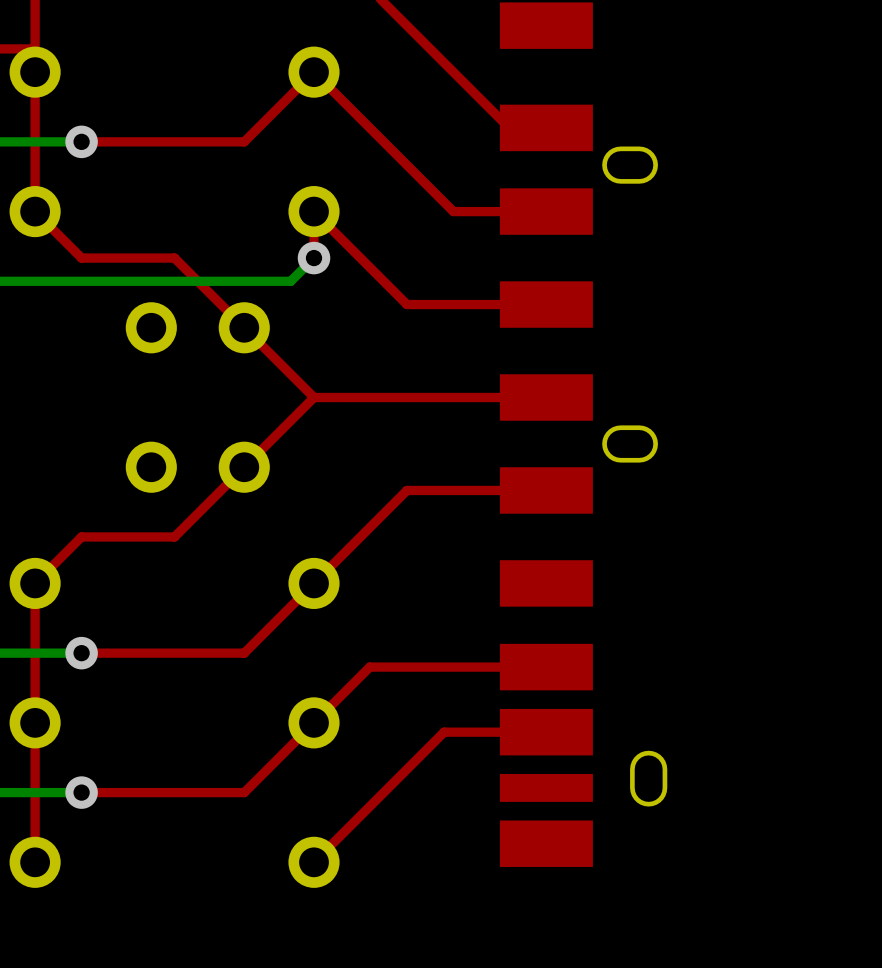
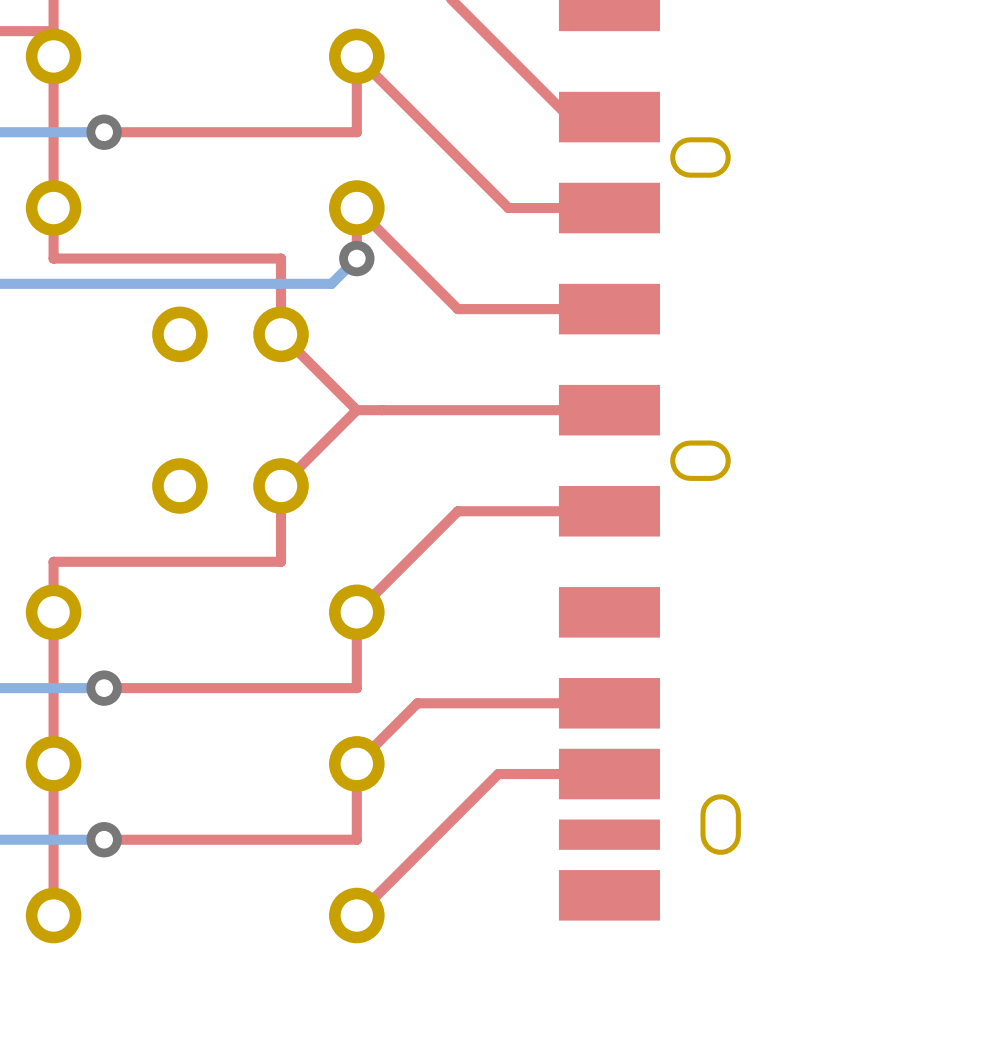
top track: (314, 72) (244, 141) -> (356, 56) (356, 132) (281, 132)
top track: (35, 211) (81, 258) -> (53, 208) (53, 258) (104, 258)
top track: (174, 258) (244, 327) -> (205, 258) (281, 258) (281, 334)
top track: (244, 467) (174, 536) -> (281, 485) (281, 561) (205, 561)
top track: (81, 536) (35, 583) -> (104, 561) (53, 561) (53, 612)
top track: (314, 583) (244, 653) -> (356, 612) (356, 688) (281, 688)
top track: (314, 722) (244, 792) -> (356, 763) (356, 839) (281, 839)

